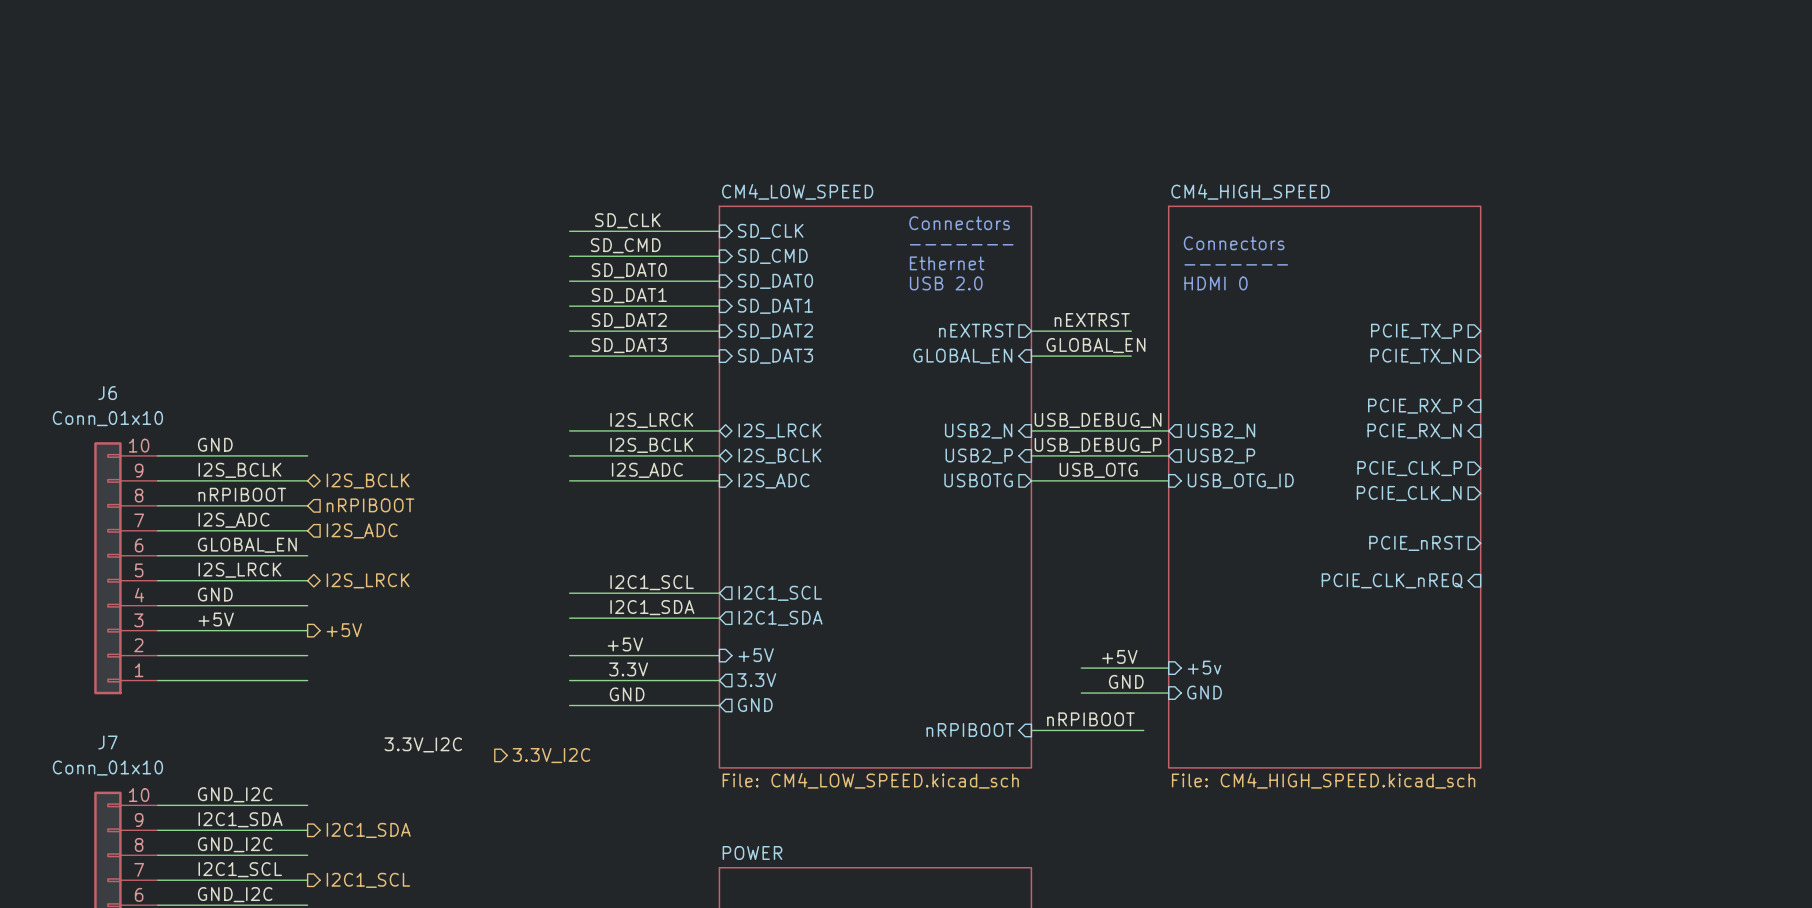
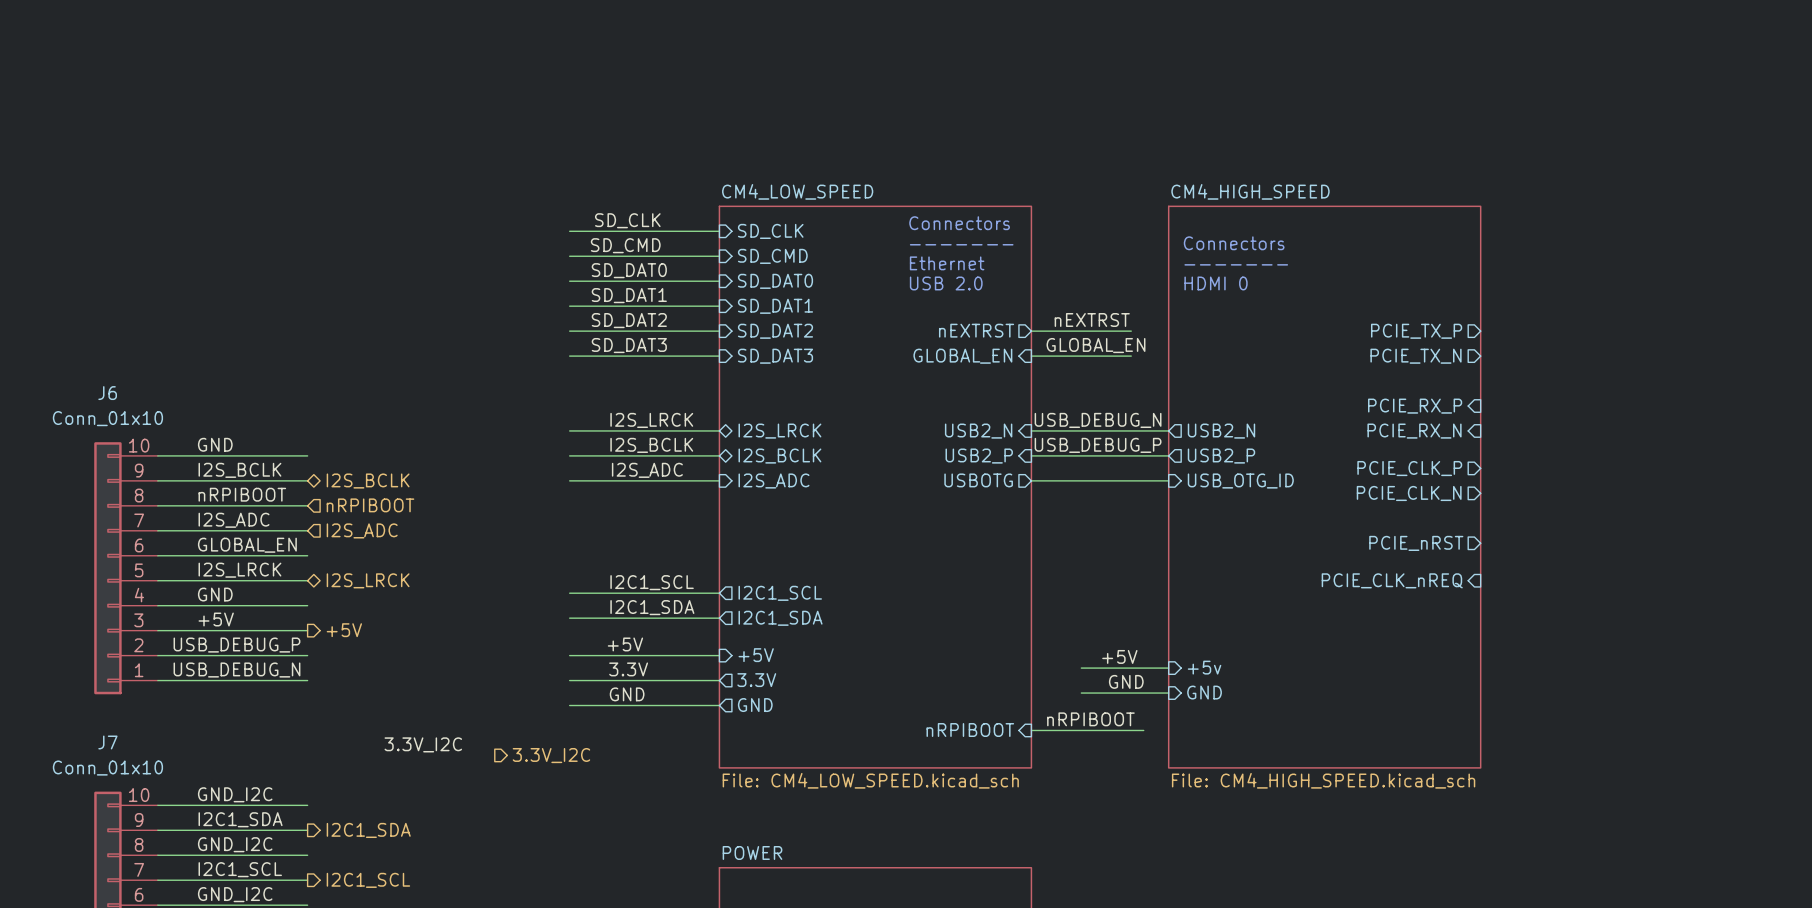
label: USB_OTG (1098, 470) -> none
label: none -> USB_DEBUG_P (236, 645)
label: none -> USB_DEBUG_N (236, 670)

